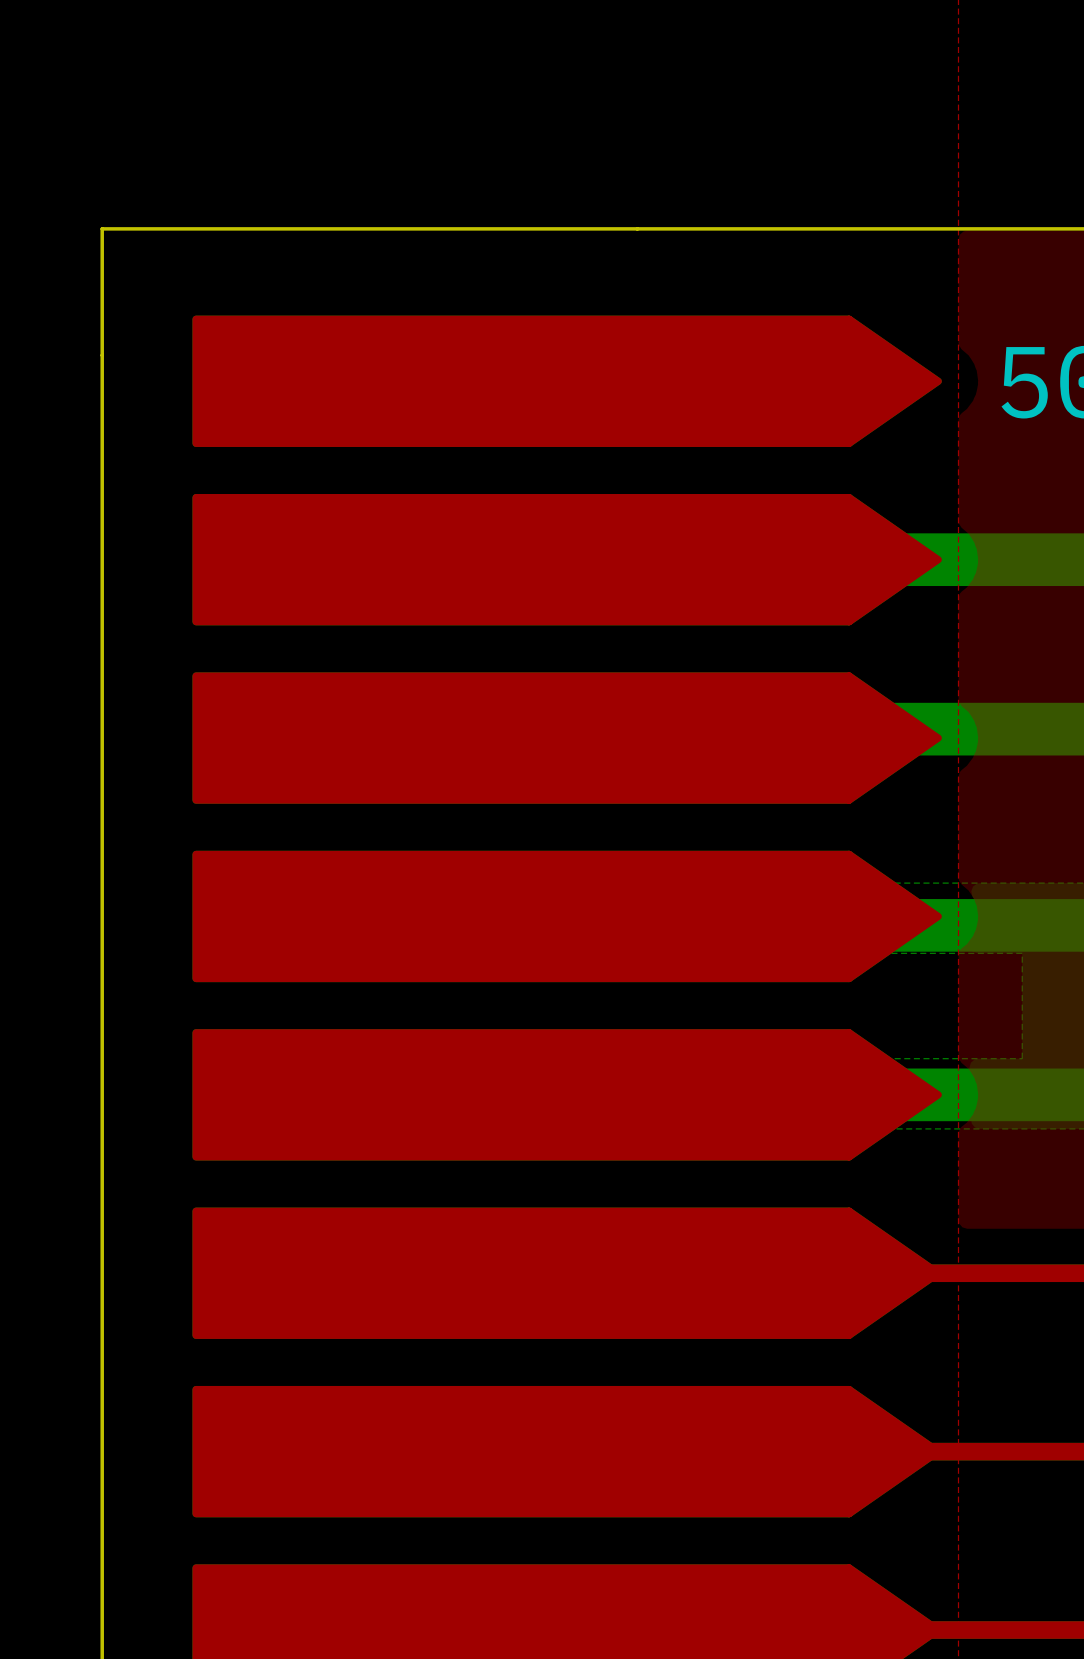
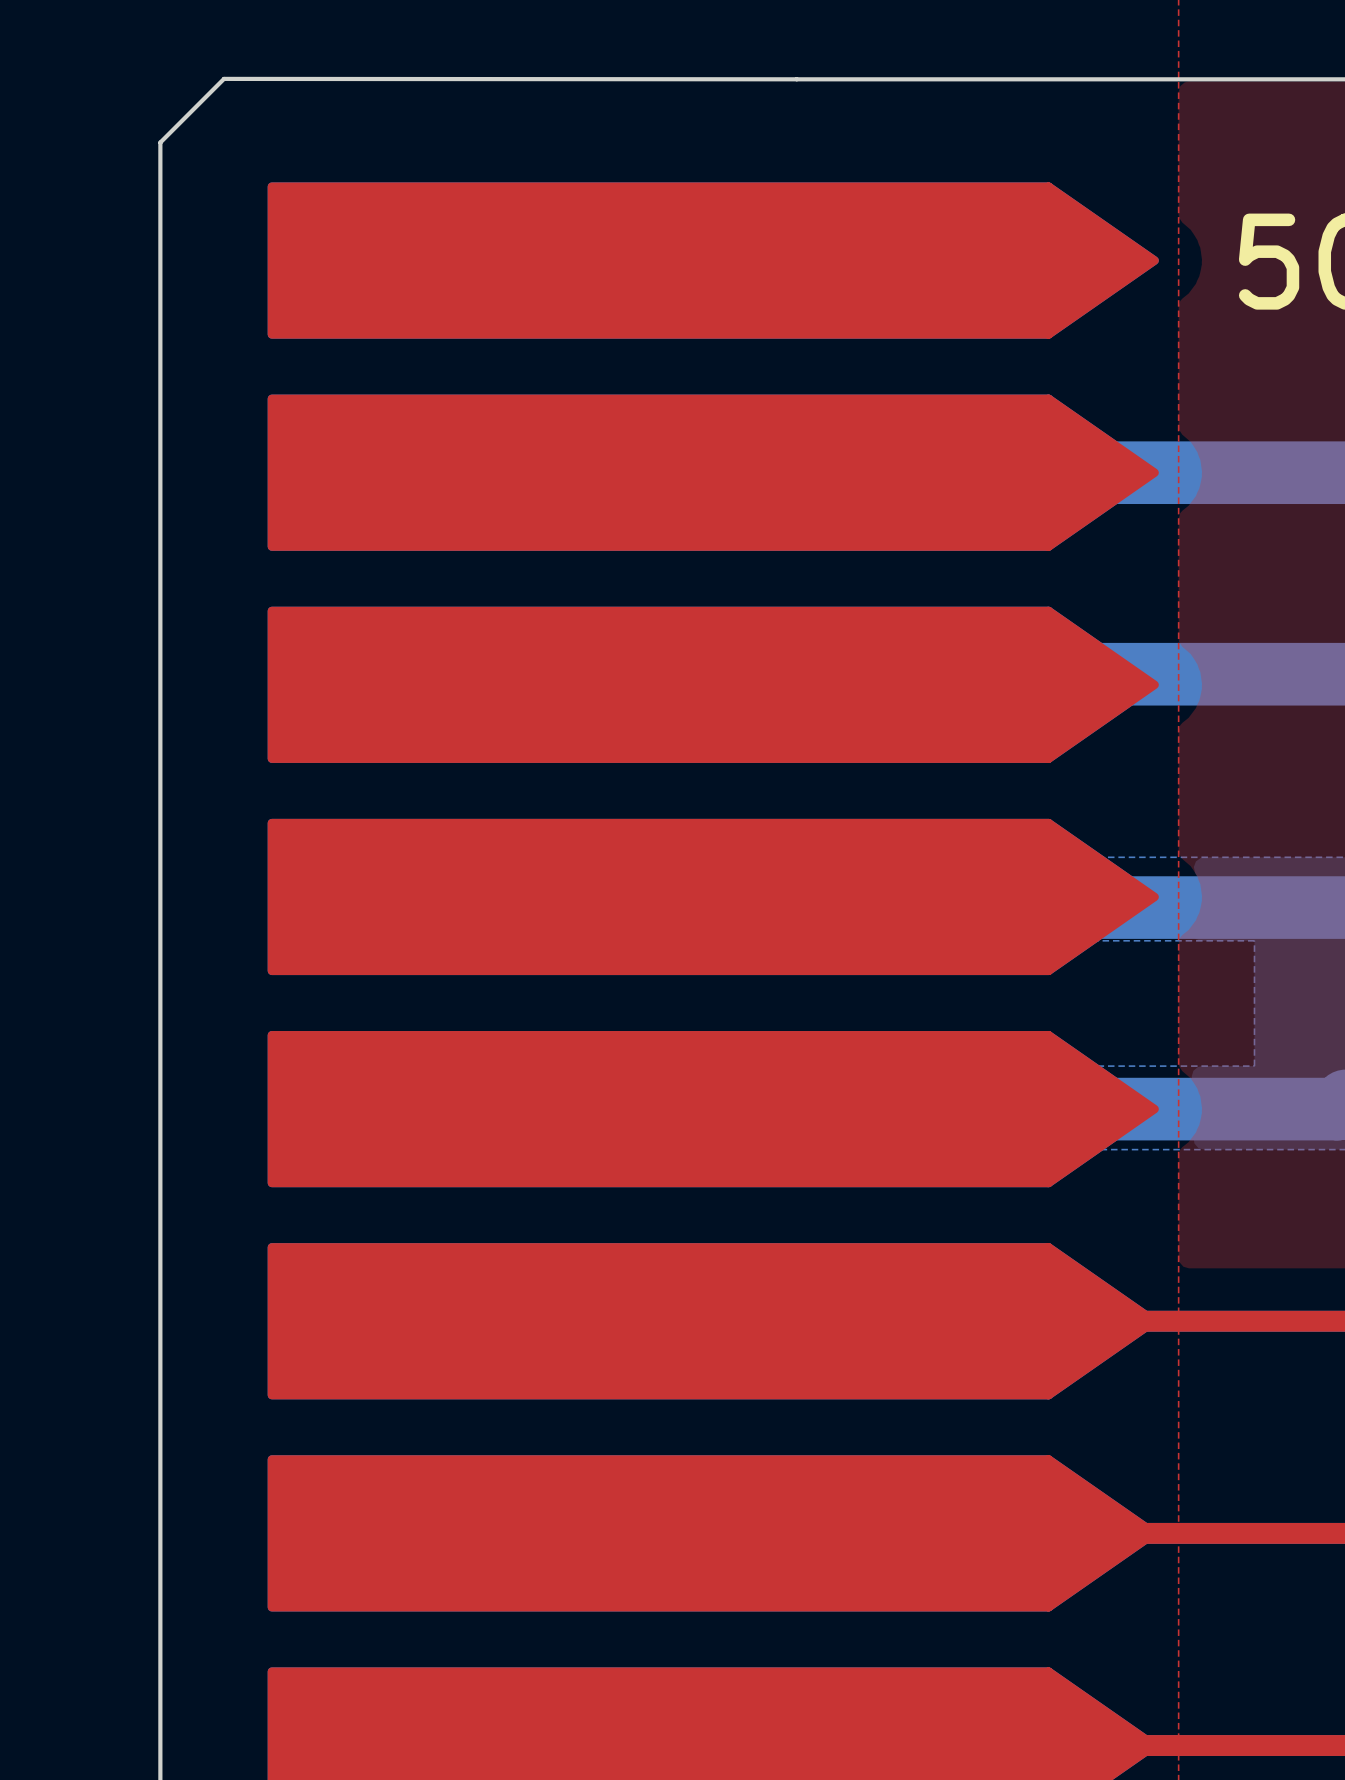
board edge: (637, 228) (102, 228) (102, 282) -> (796, 79) (224, 78) (160, 142)

